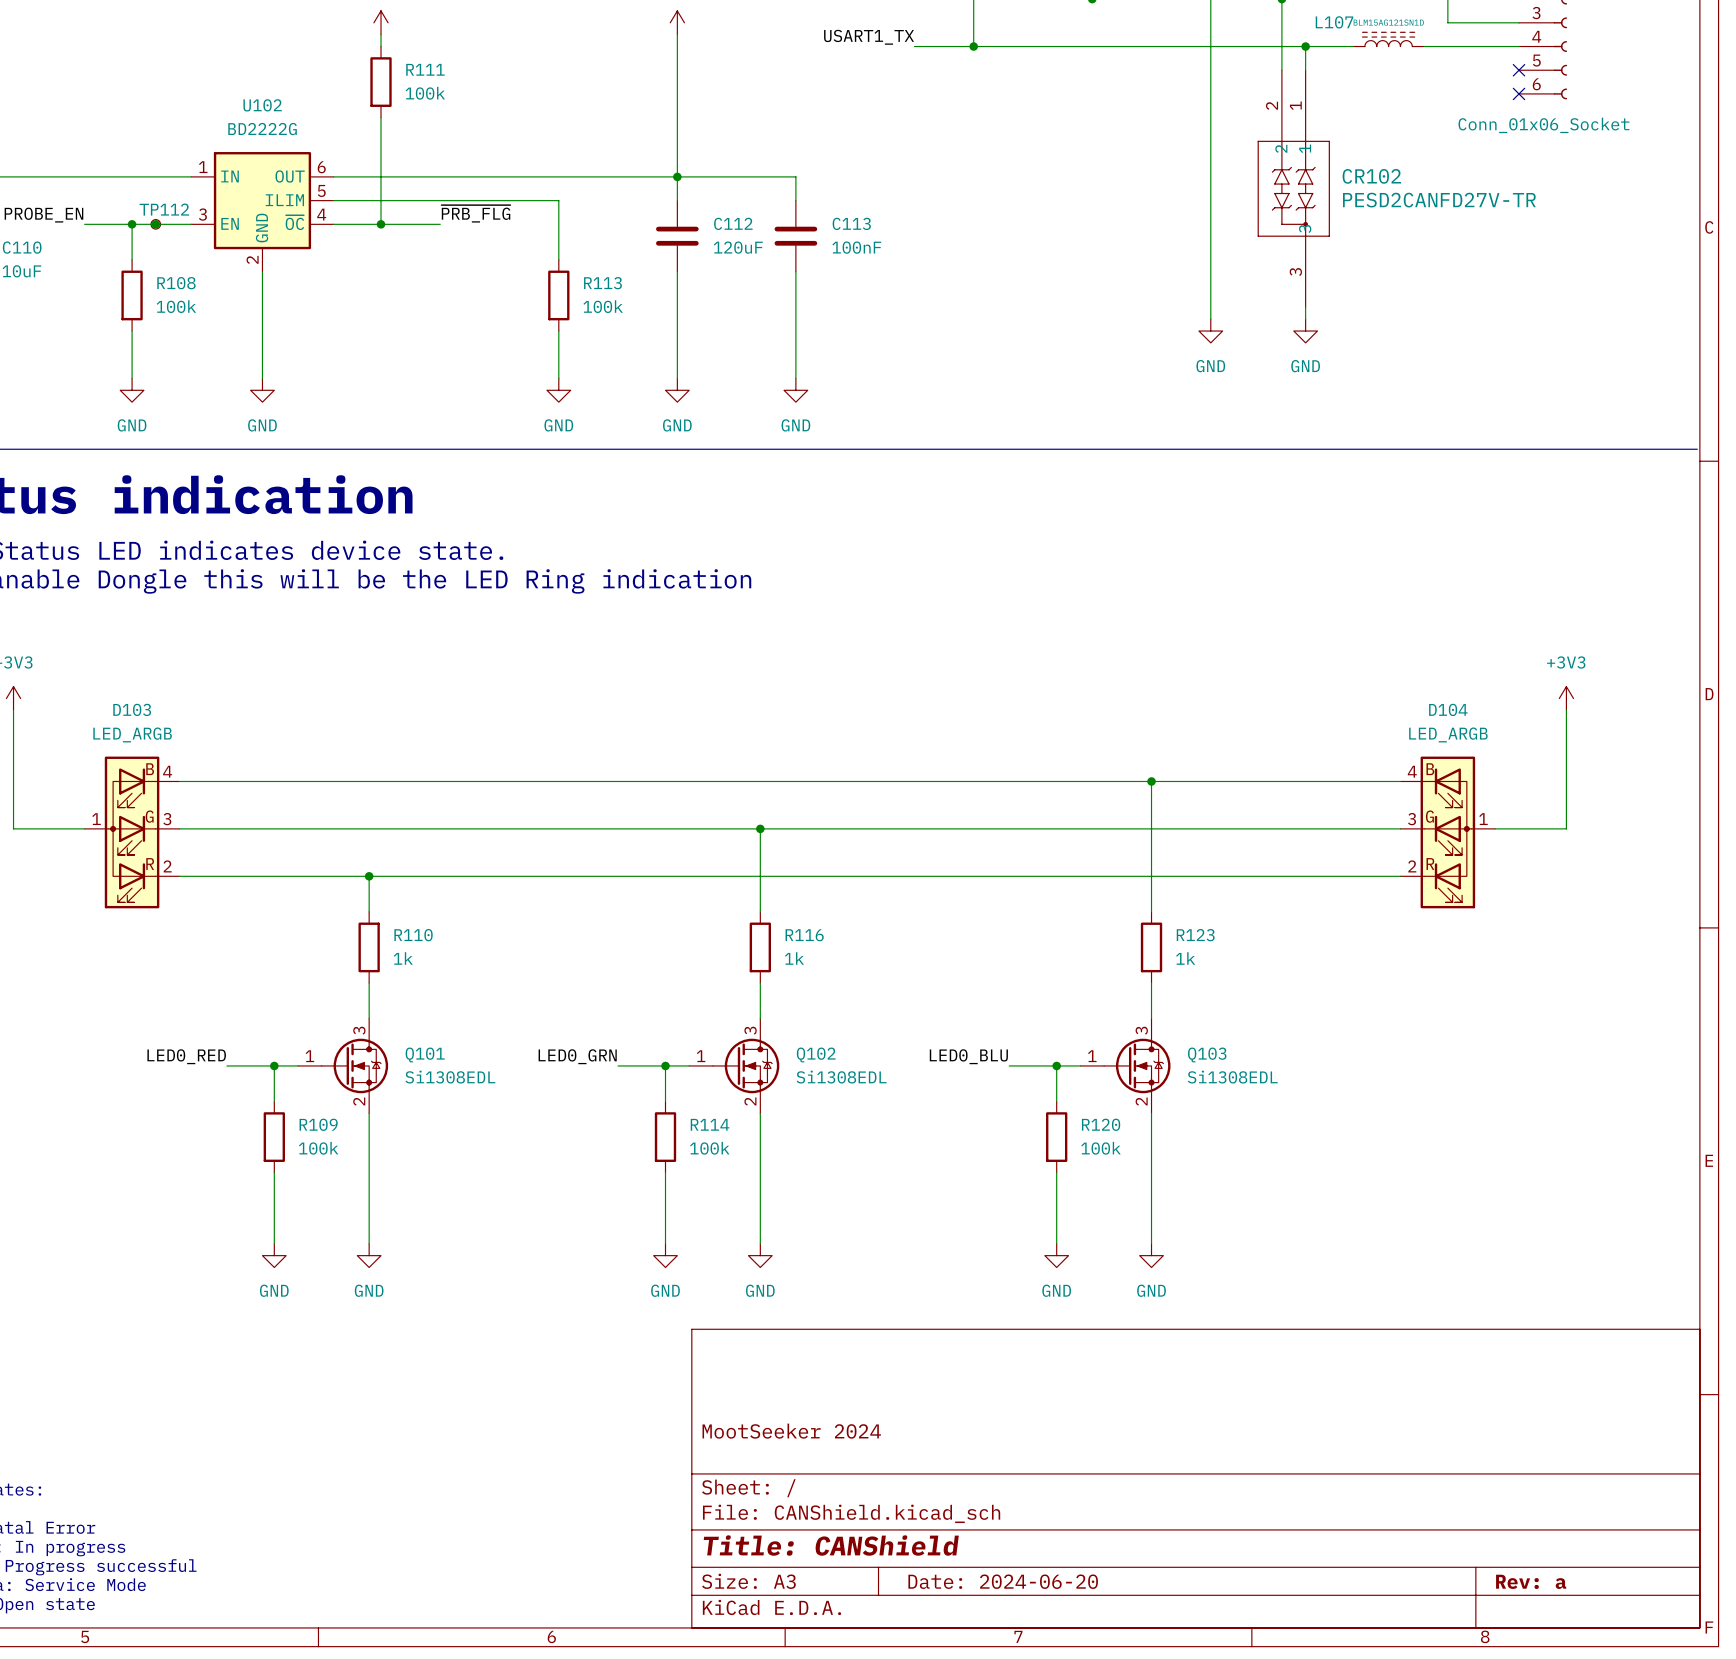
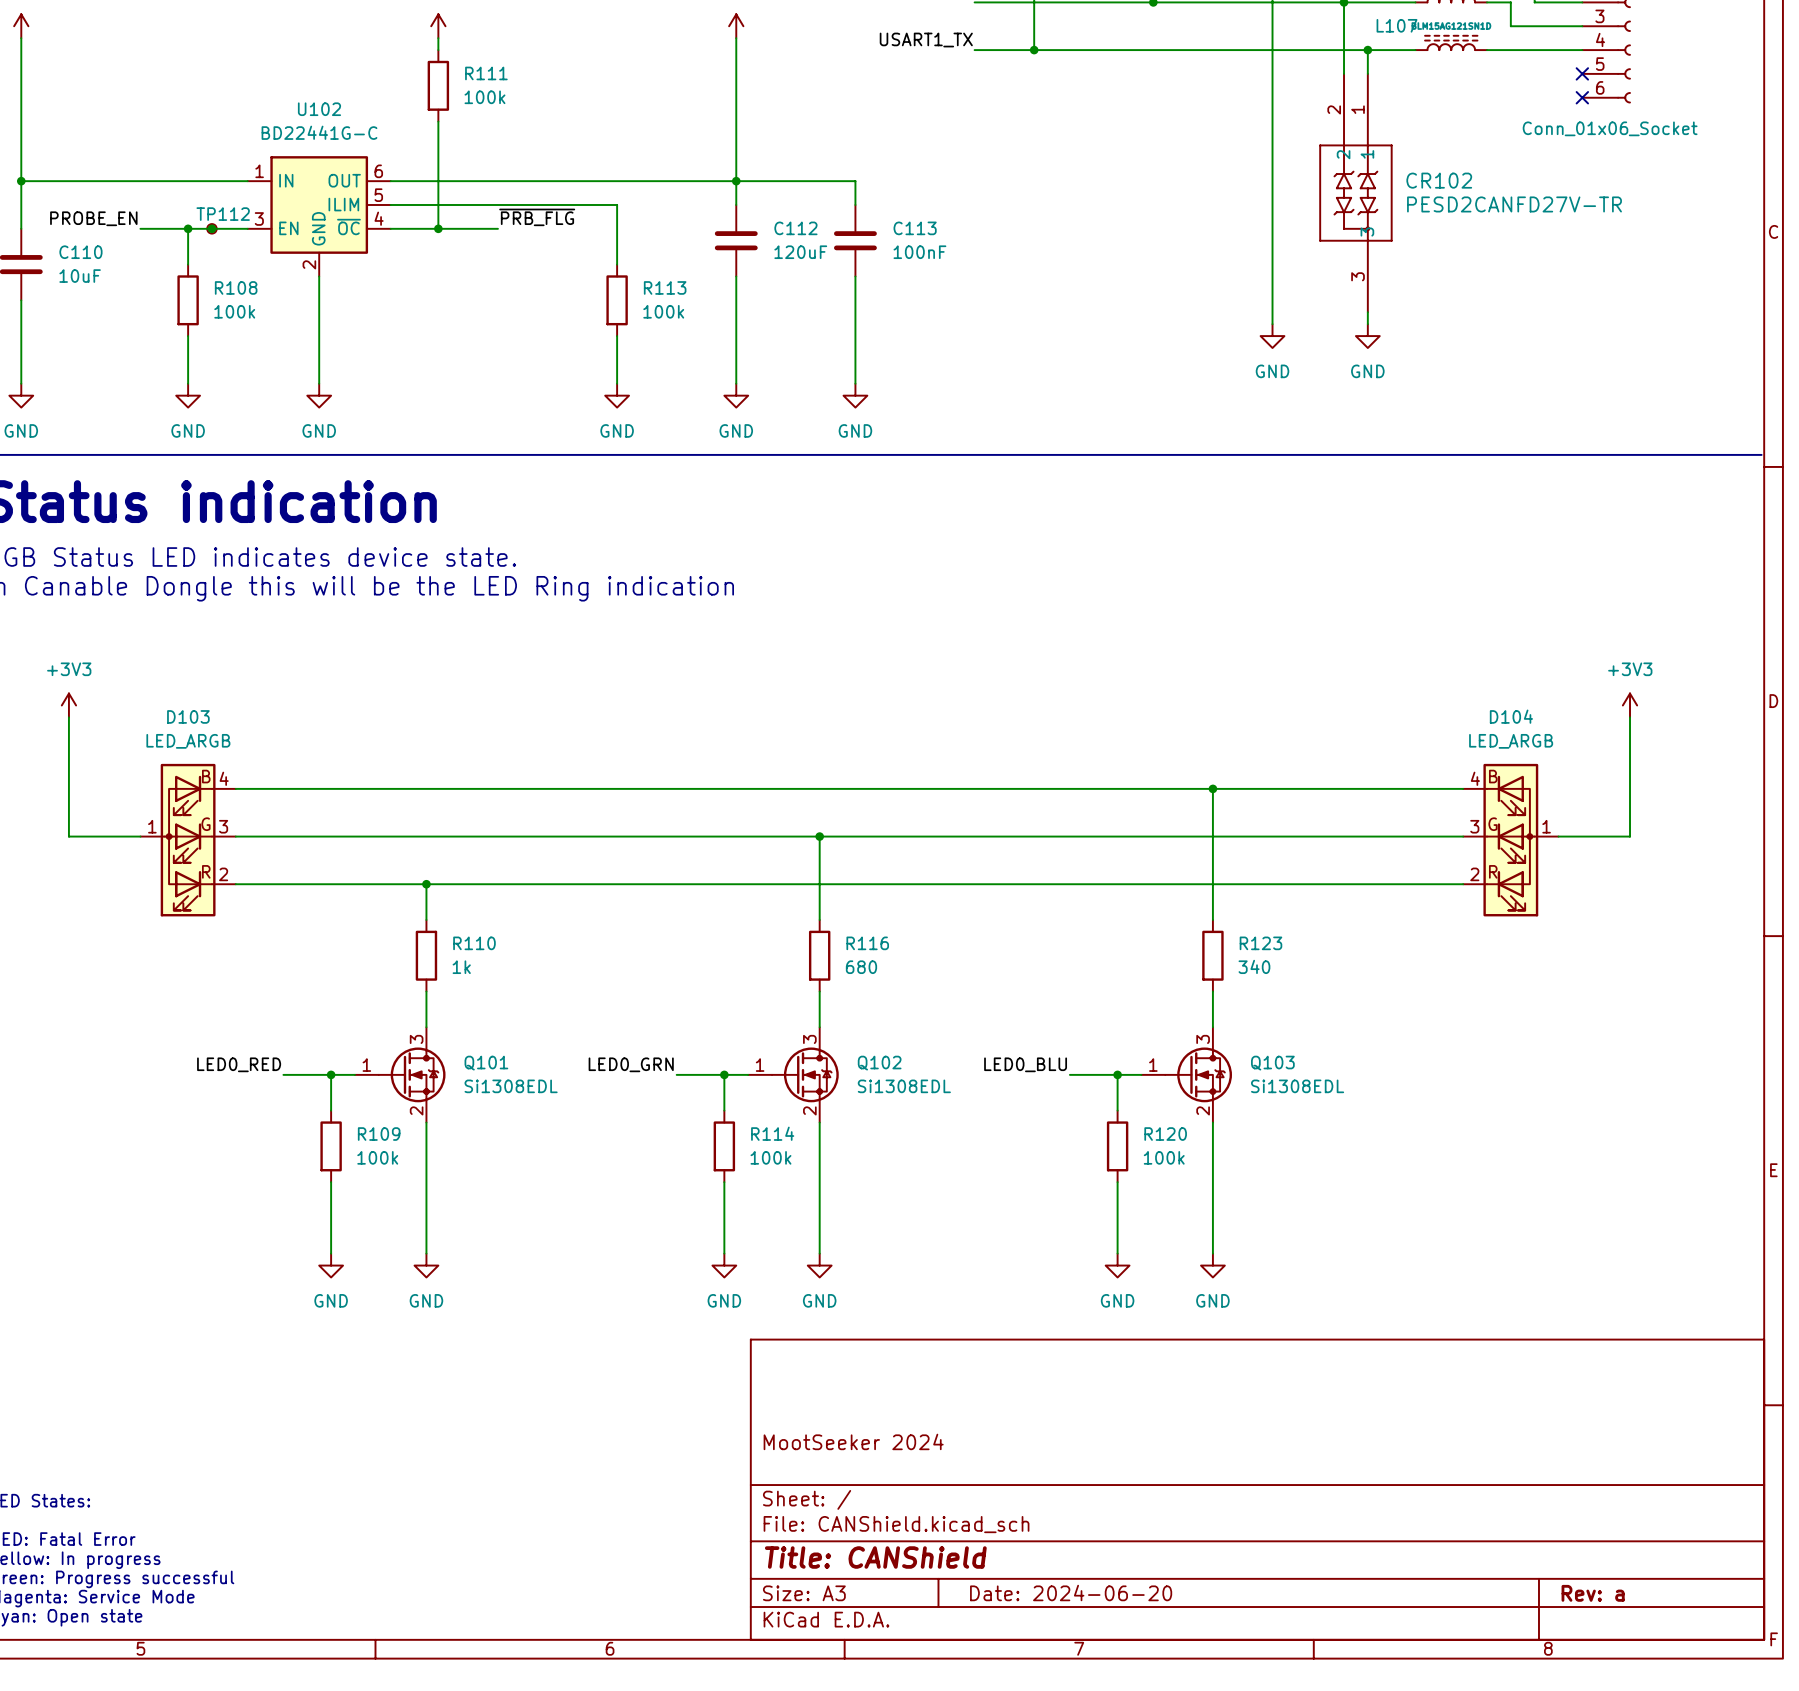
U102 value: BD2222G (262, 129) -> BD22441G-C (319, 132)
R116 value: 1k (794, 958) -> 680 (861, 967)
R123 value: 1k (1185, 958) -> 340 (1254, 966)

